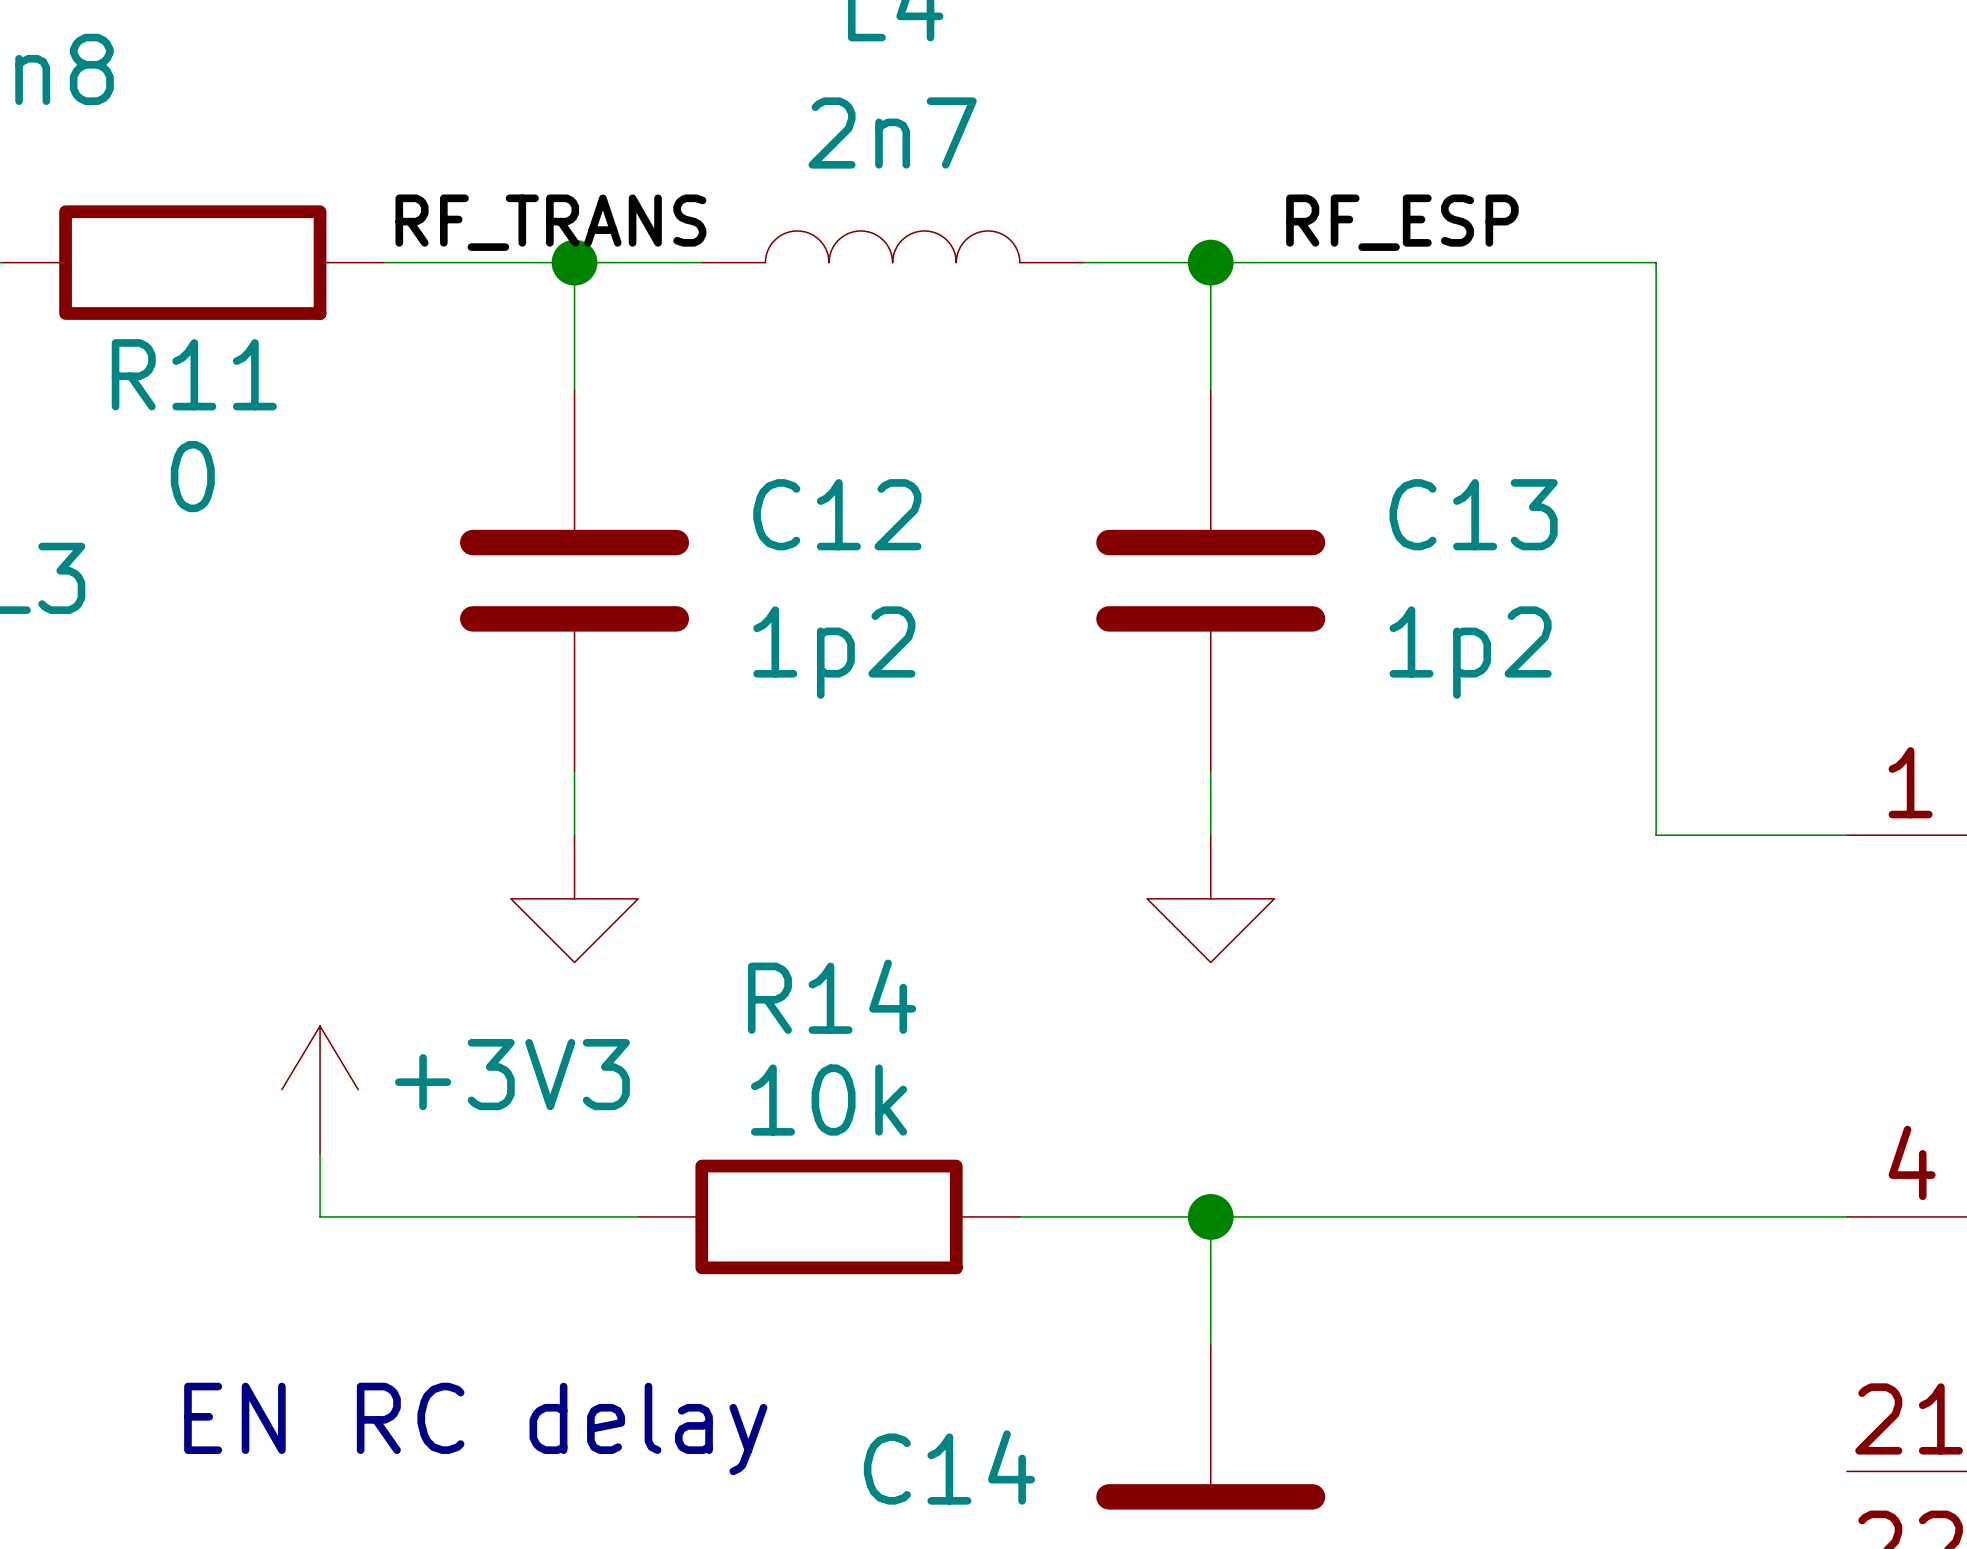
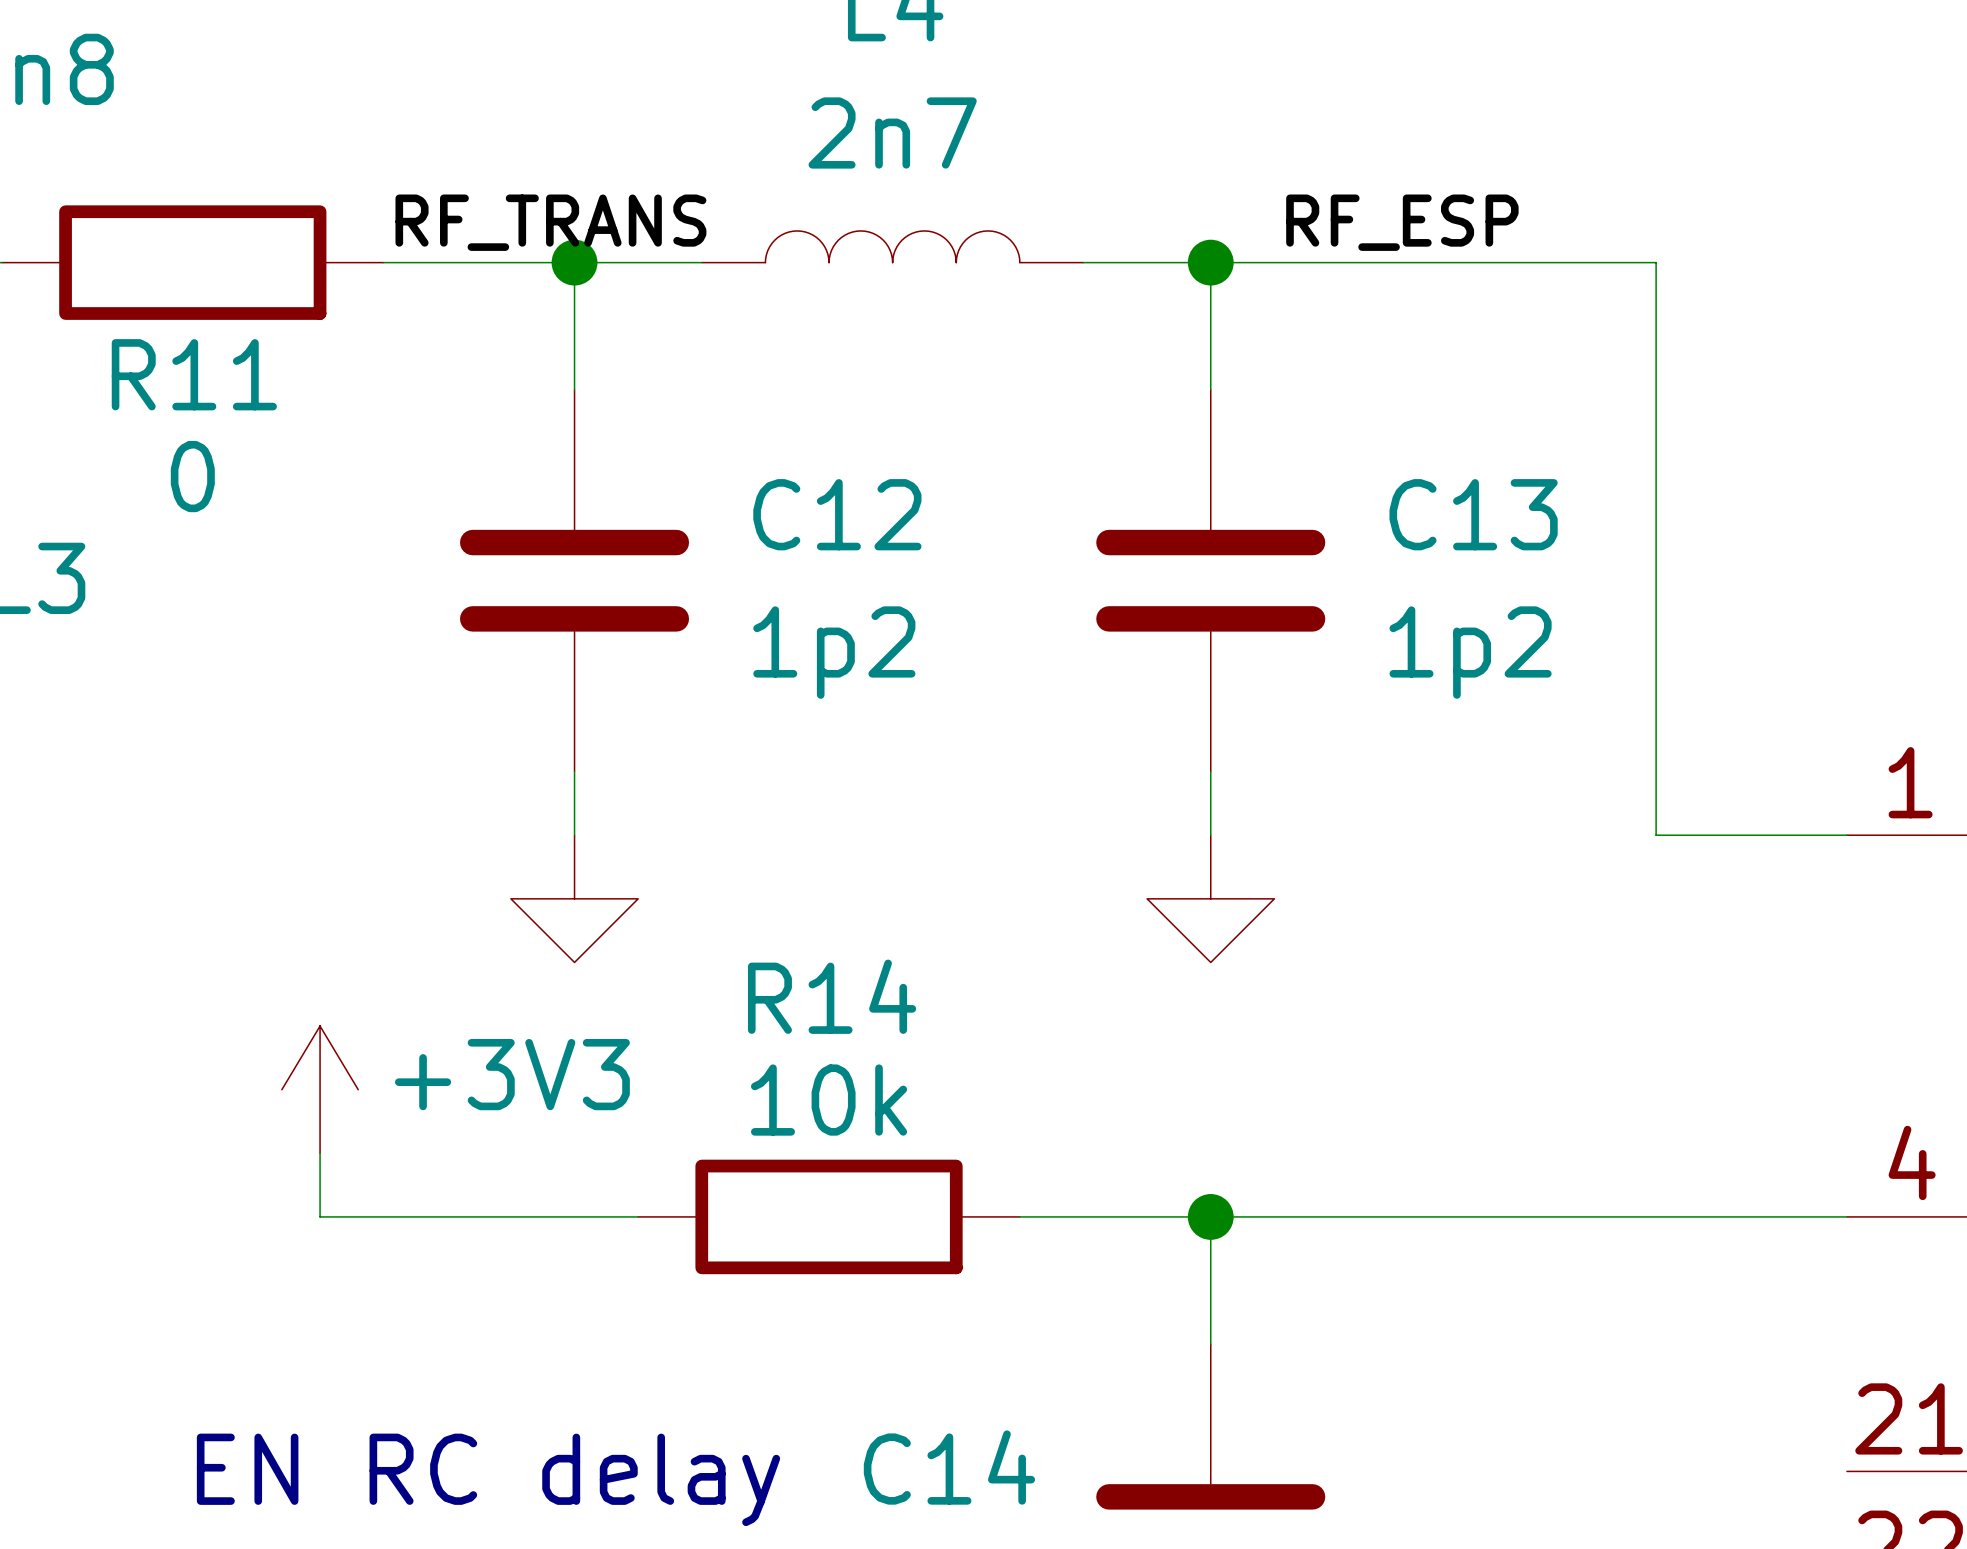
text position: EN RC delay (475, 1428) -> EN RC delay (488, 1479)

